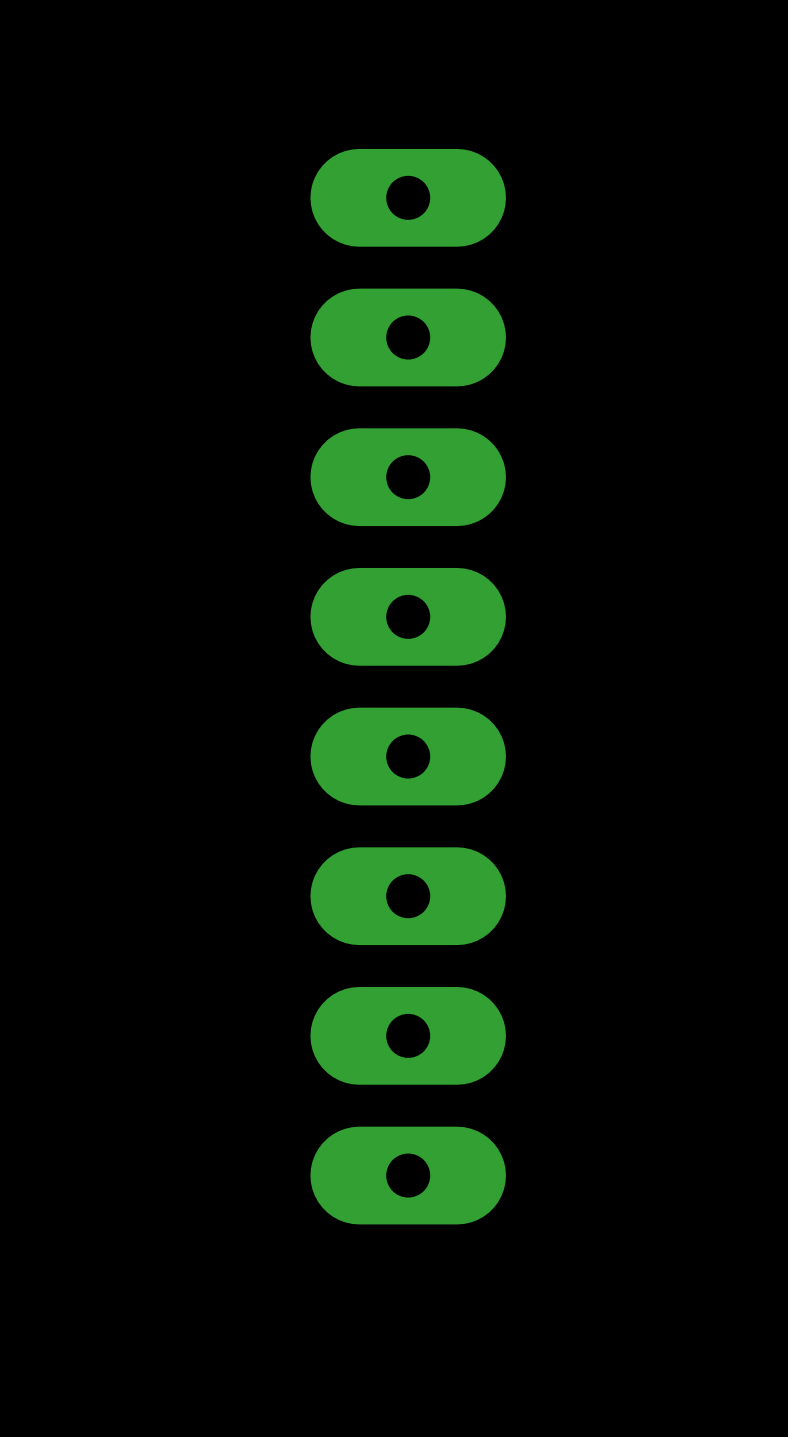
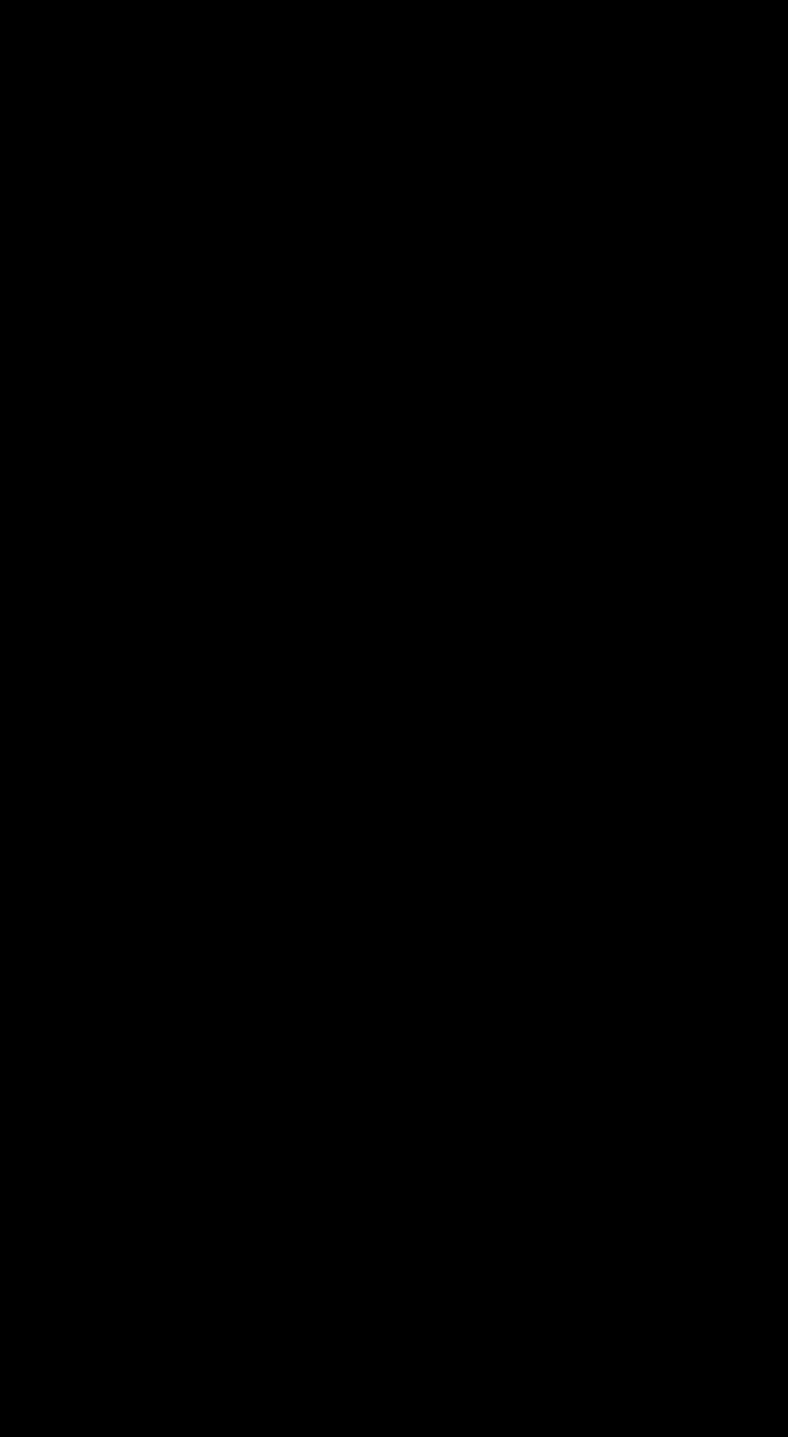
part: (408, 686) -> none

